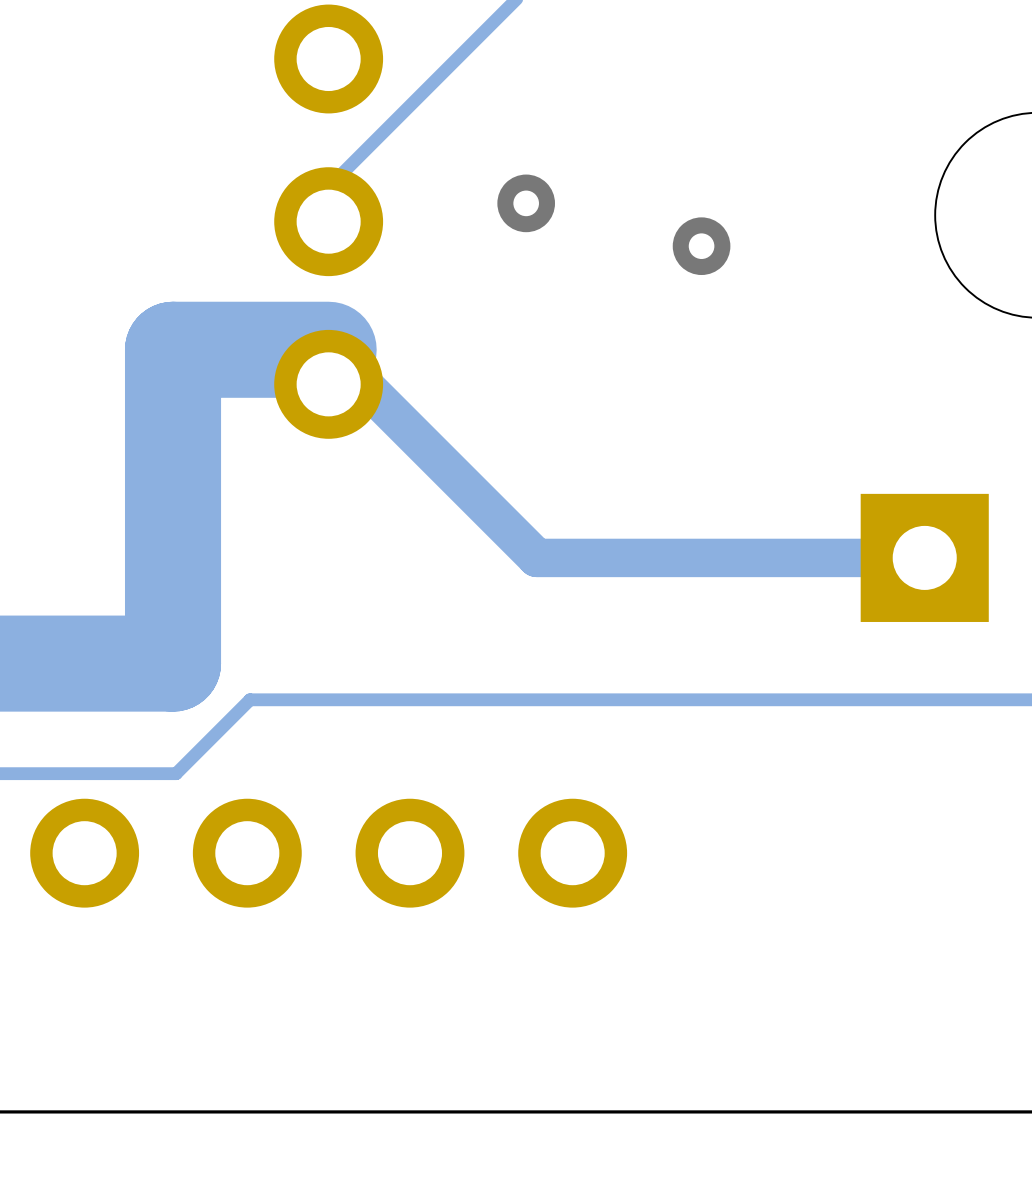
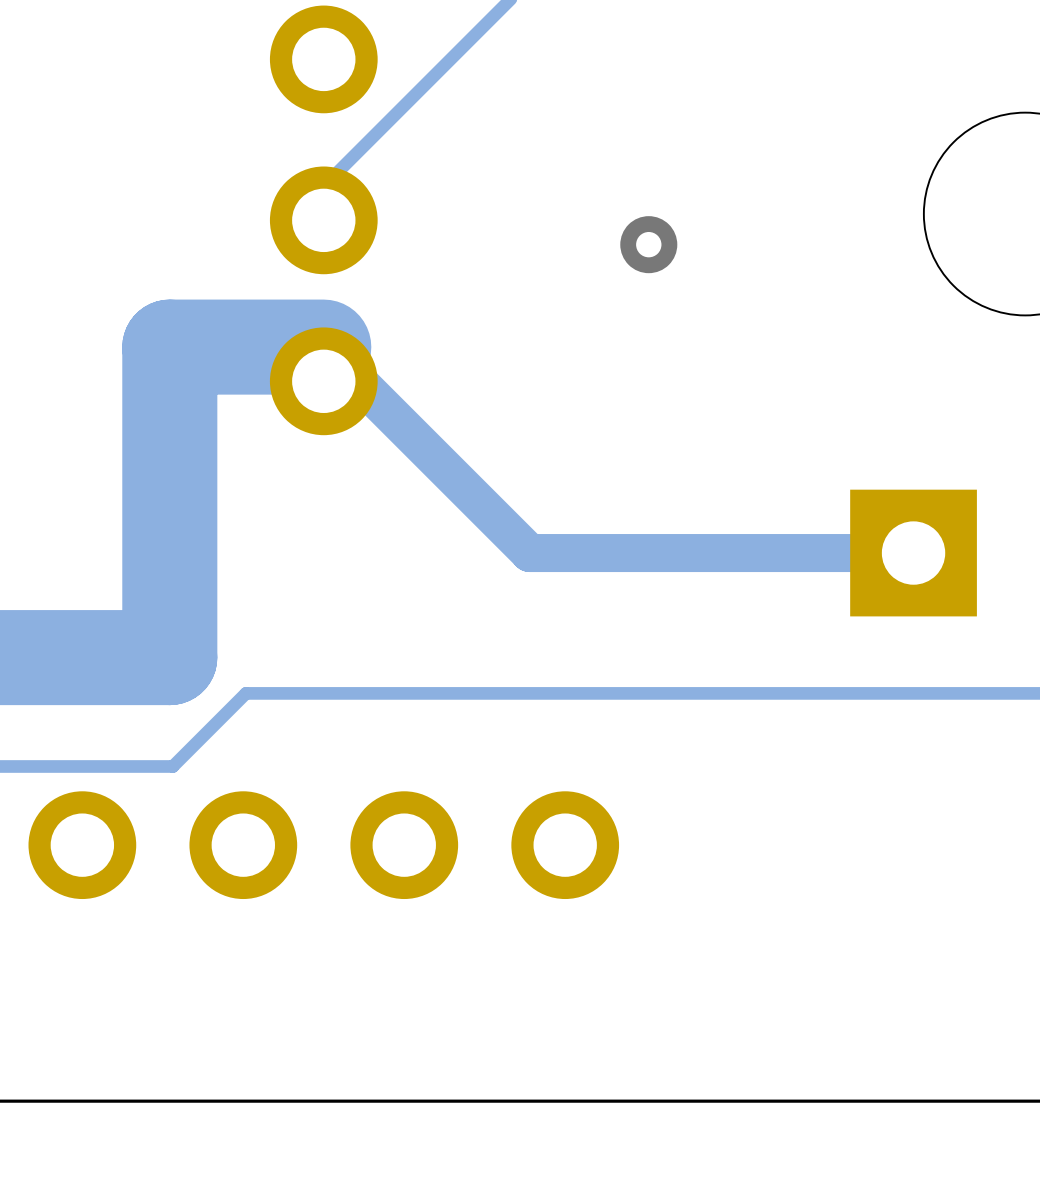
via: (526, 203) -> none
via position: (701, 246) -> (648, 244)

